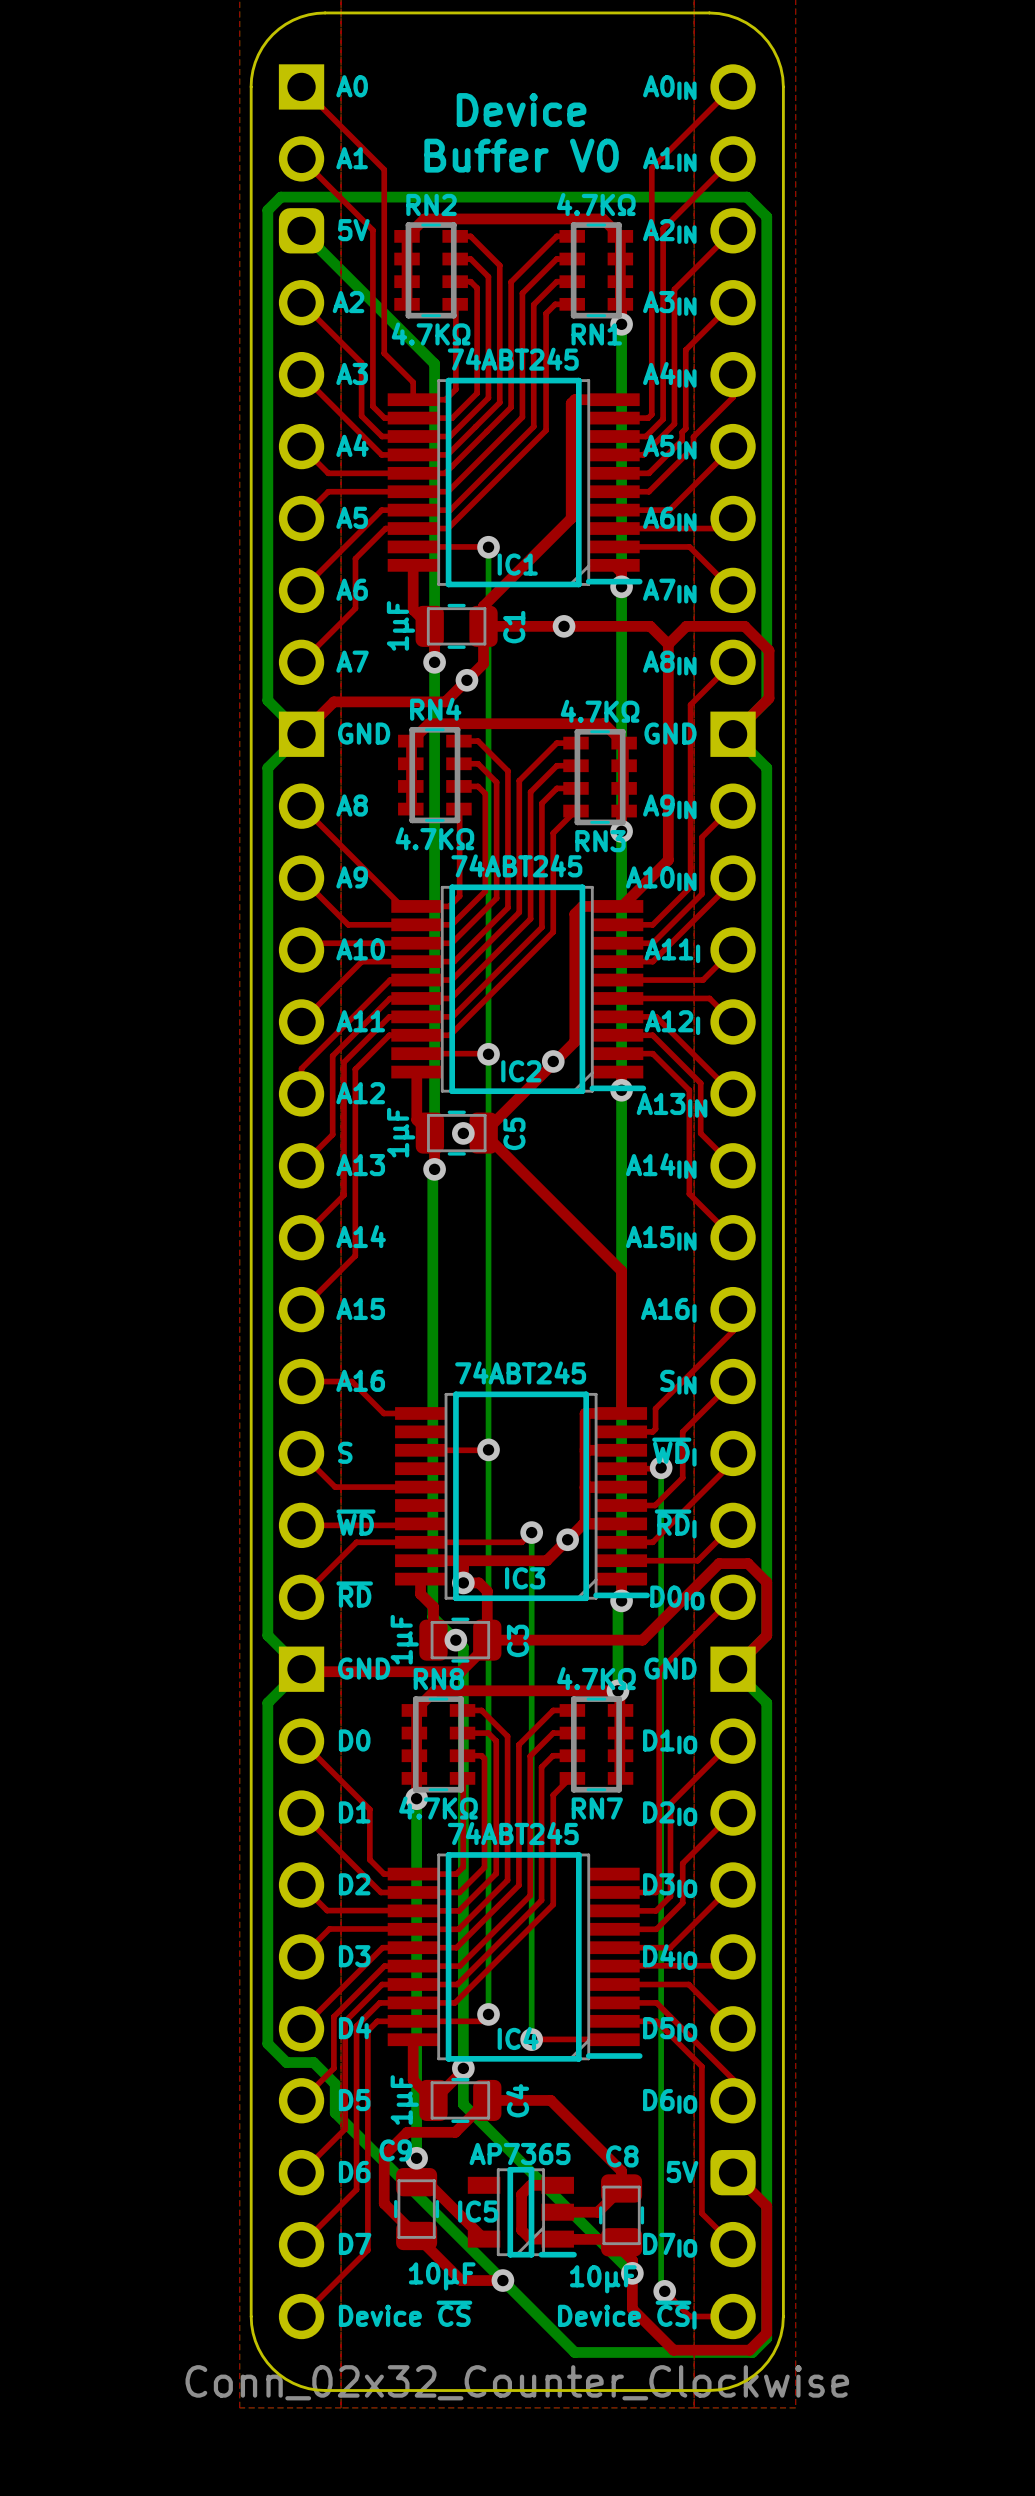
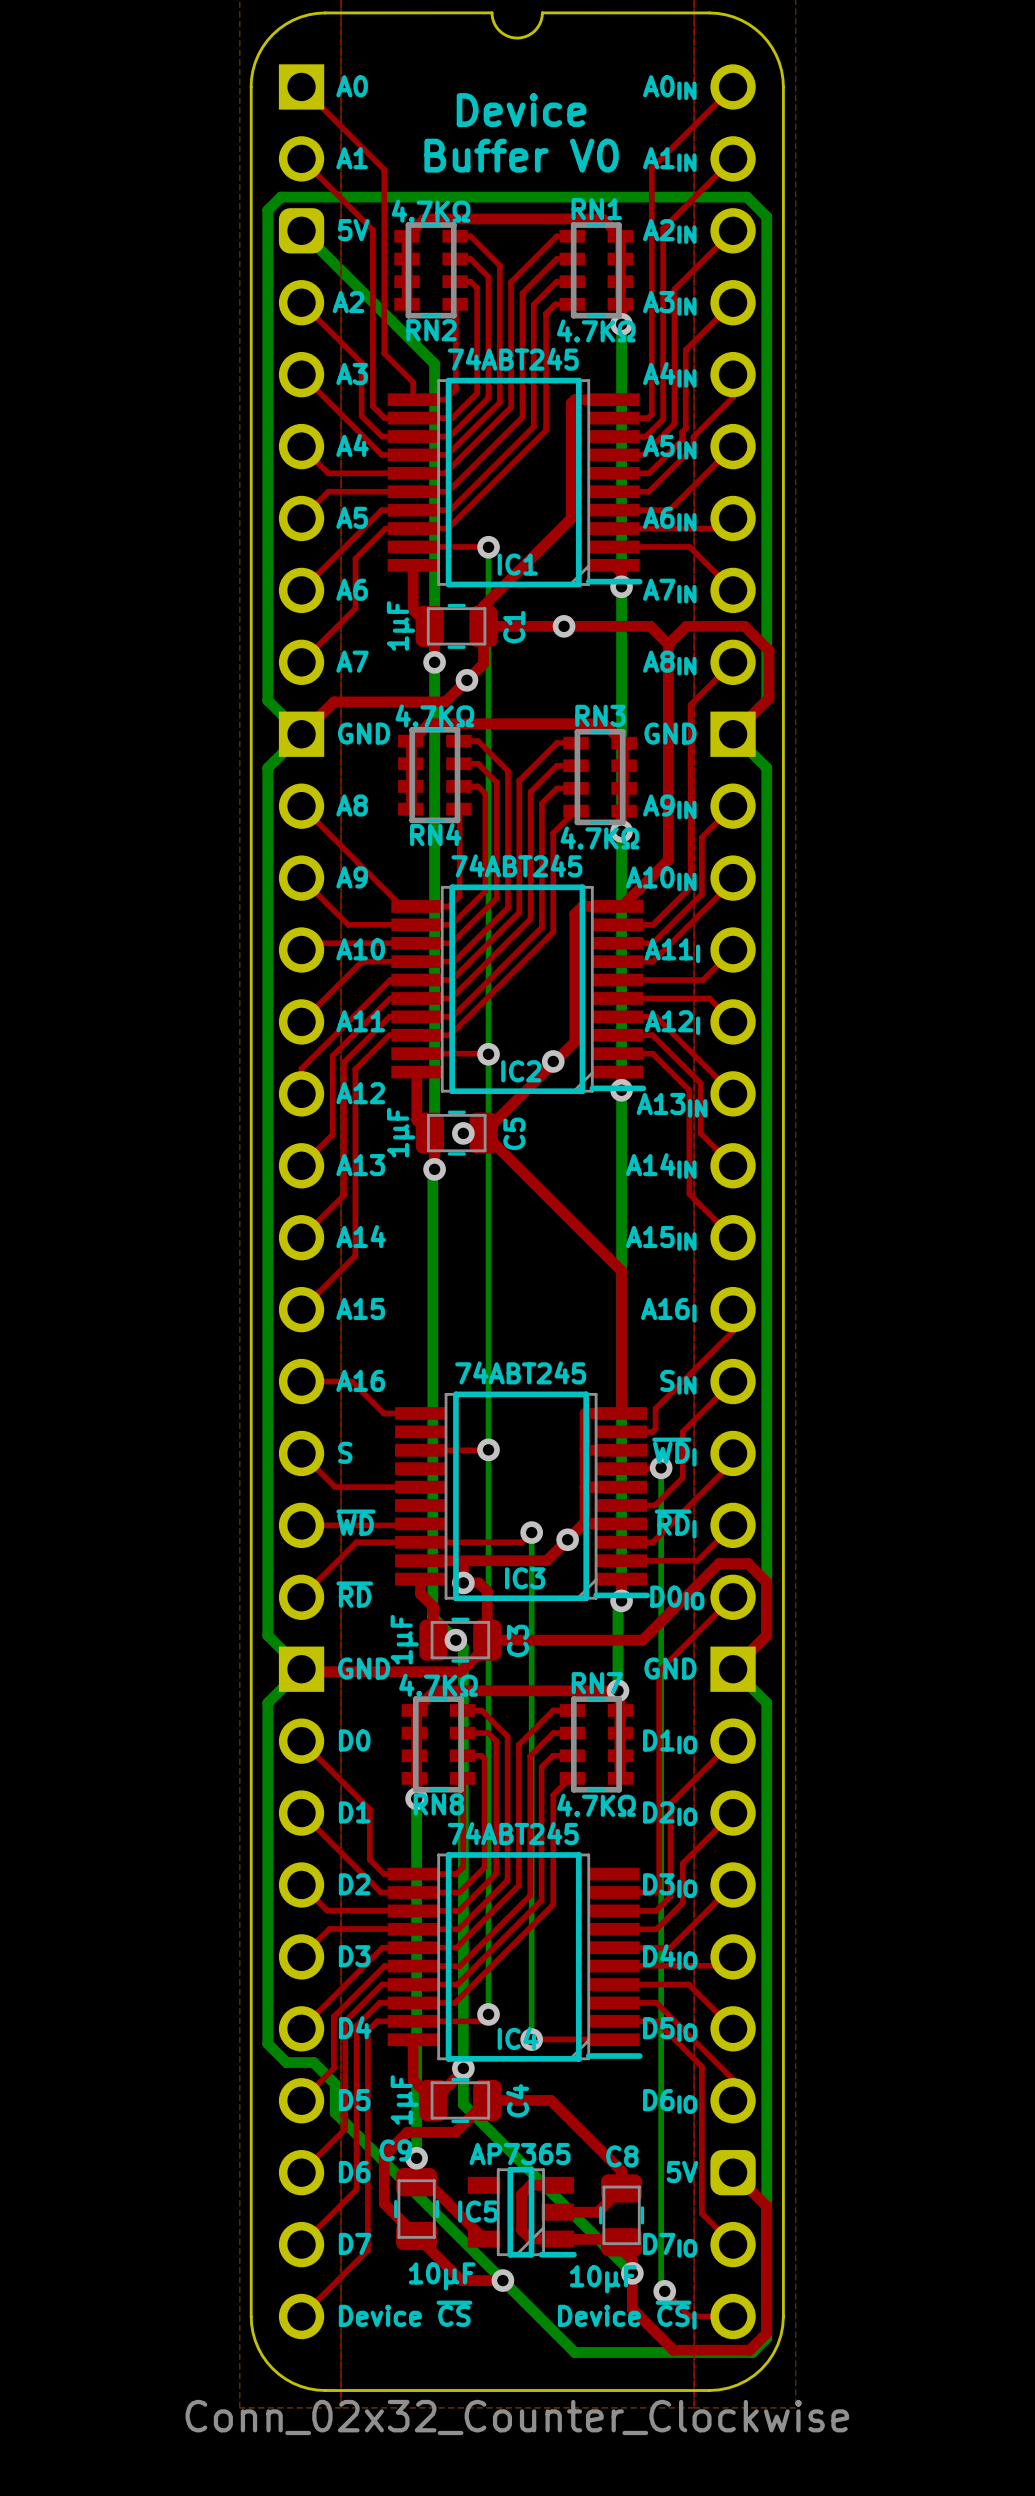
part footprint: [249, 11, 785, 2392] -> [249, 11, 785, 2392]
RN2 name position: RN2 (431, 204) -> RN2 (431, 330)
RN1 text position: 4.7KΩ (596, 204) -> 4.7KΩ (596, 330)
RN2 text position: 4.7KΩ (431, 333) -> 4.7KΩ (431, 211)
RN1 name position: RN1 (596, 334) -> RN1 (596, 209)
RN4 name position: RN4 (435, 709) -> RN4 (435, 834)
RN3 text position: 4.7KΩ (600, 711) -> 4.7KΩ (599, 837)
RN4 text position: 4.7KΩ (434, 838) -> 4.7KΩ (434, 715)
RN3 name position: RN3 (600, 841) -> RN3 (600, 715)
RN7 text position: 4.7KΩ (596, 1678) -> 4.7KΩ (596, 1805)
RN8 name position: RN8 (438, 1679) -> RN8 (438, 1804)
RN8 text position: 4.7KΩ (438, 1808) -> 4.7KΩ (438, 1685)
RN7 name position: RN7 (597, 1808) -> RN7 (597, 1683)
part value position: Conn_02x32_Counter_Clockwise (517, 2382) -> Conn_02x32_Counter_Clockwise (517, 2417)

